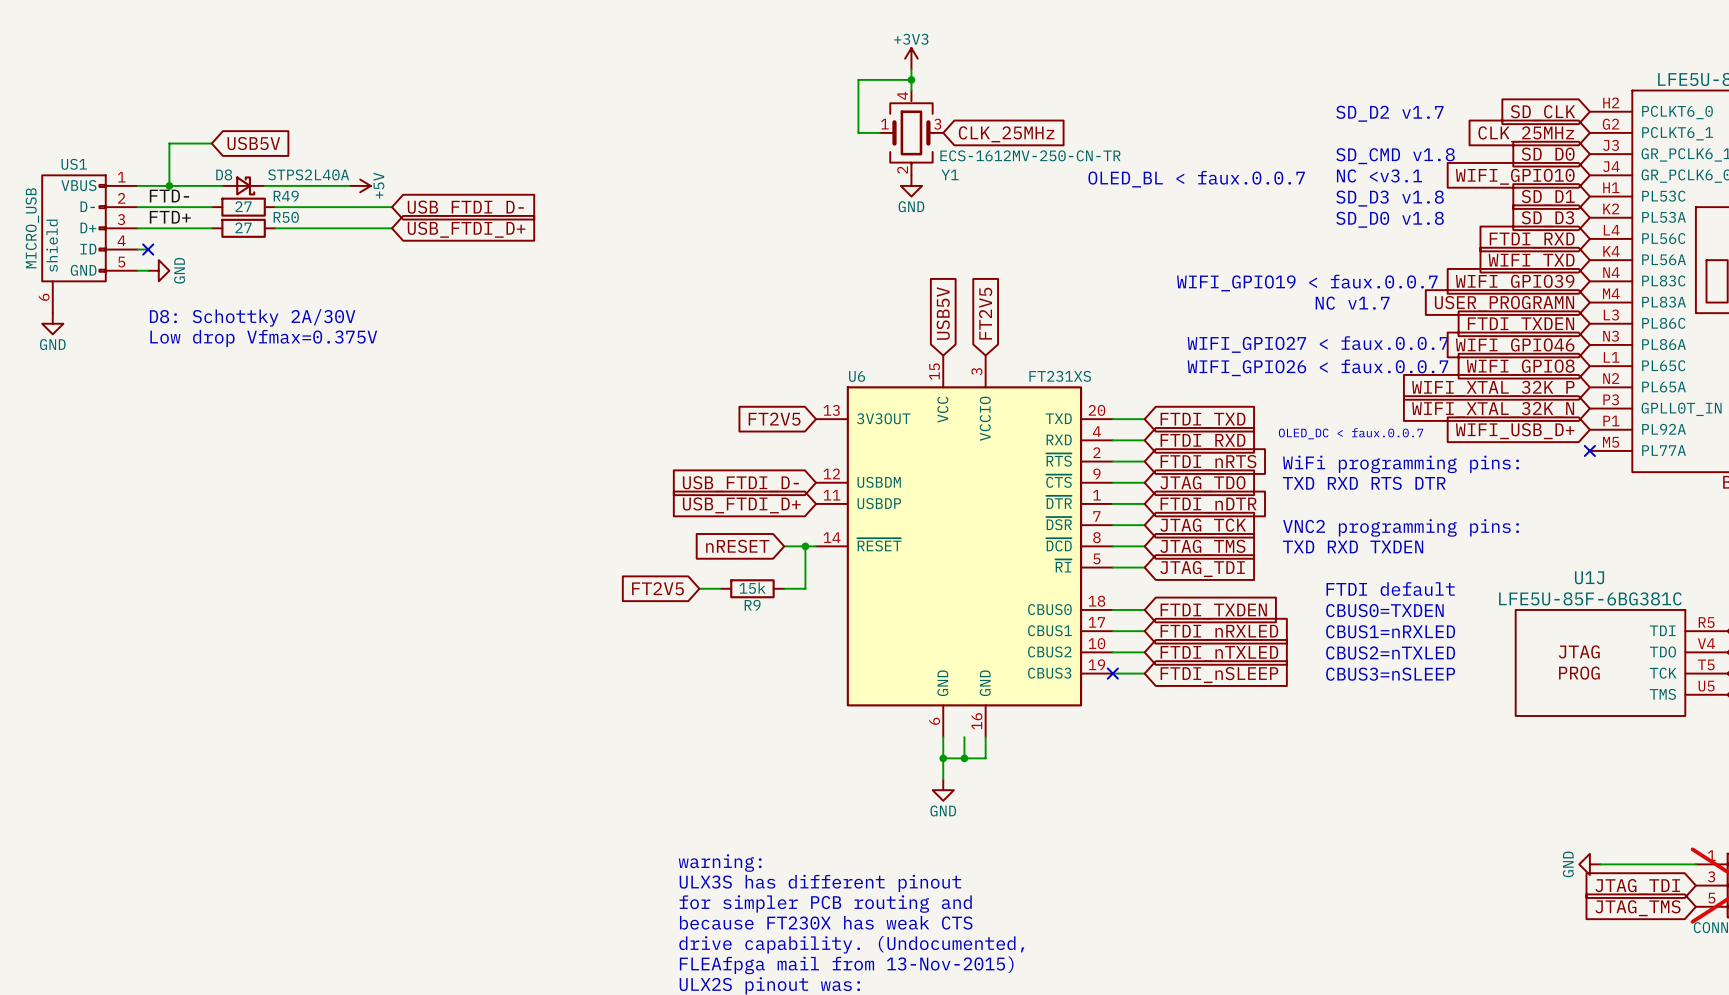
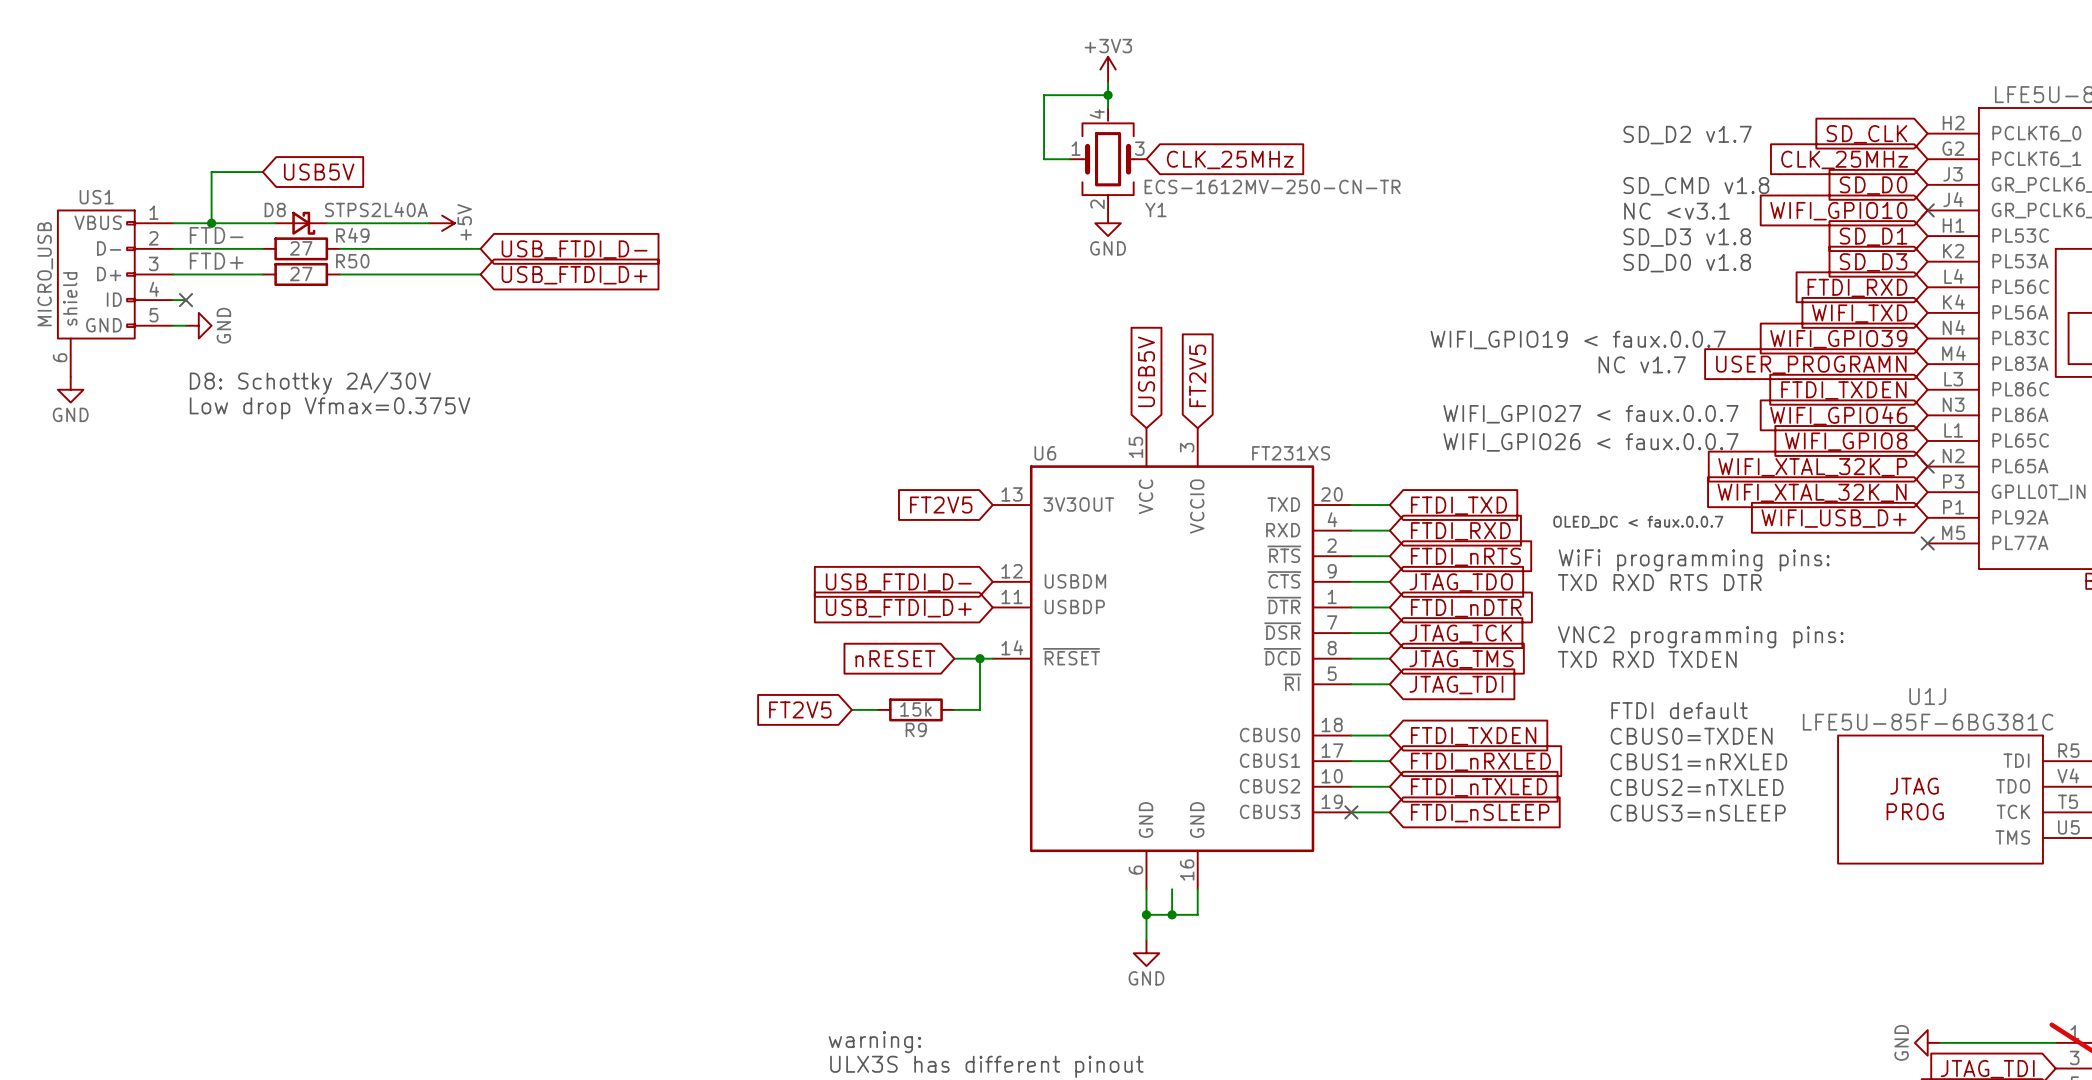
no-connect mark: none -> (1927, 210)
text: OLED_BL < faux.0.0.7 (1196, 179) -> none
no-connect mark: none -> (1927, 466)

